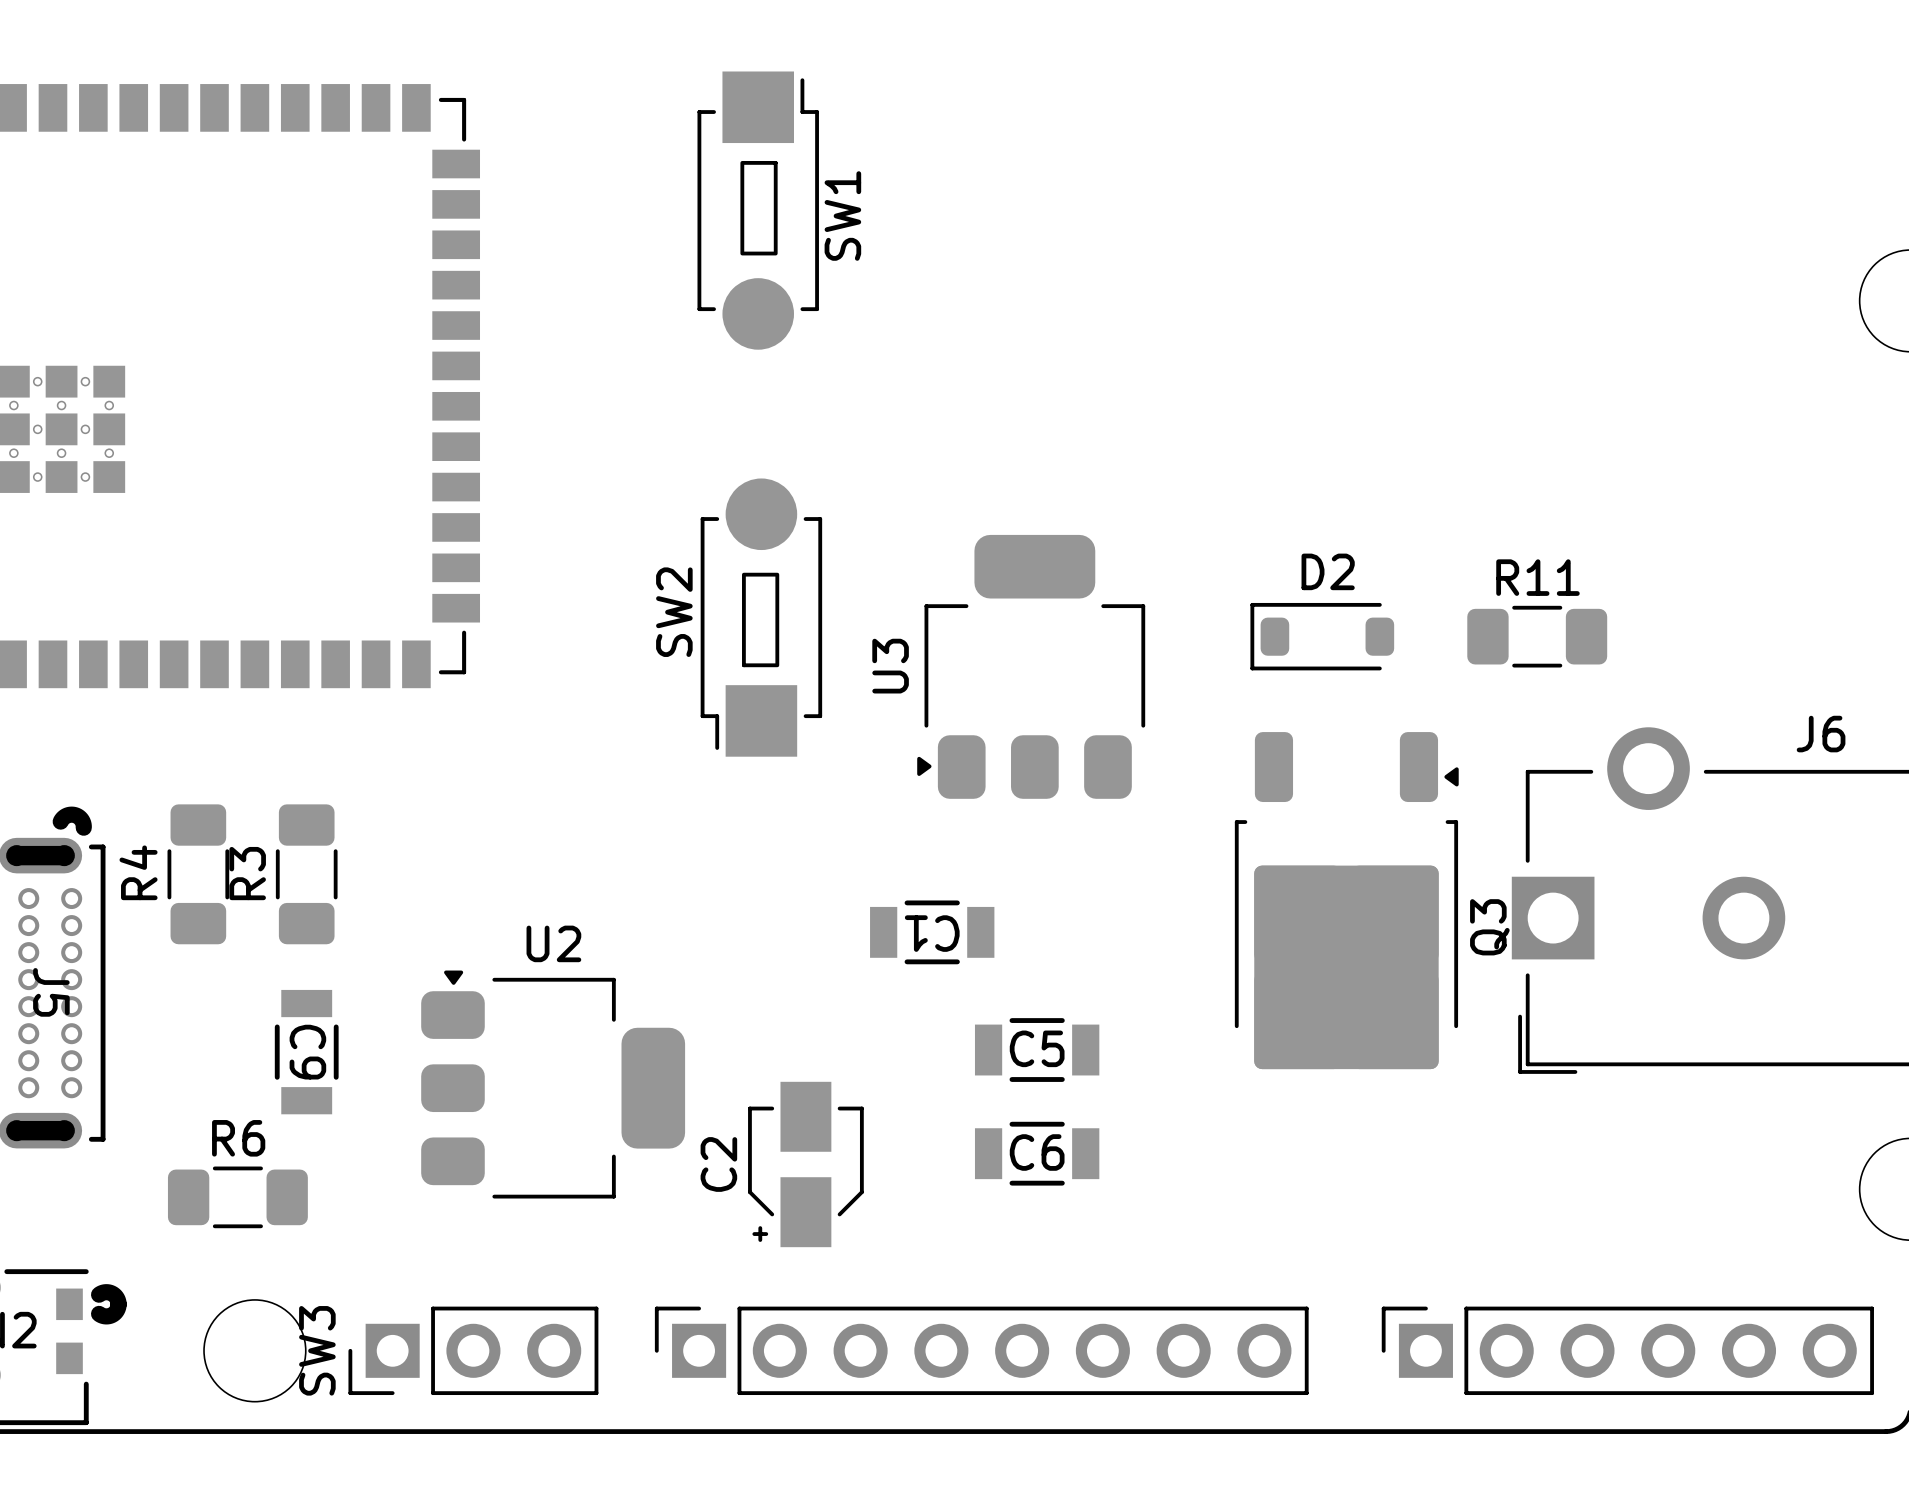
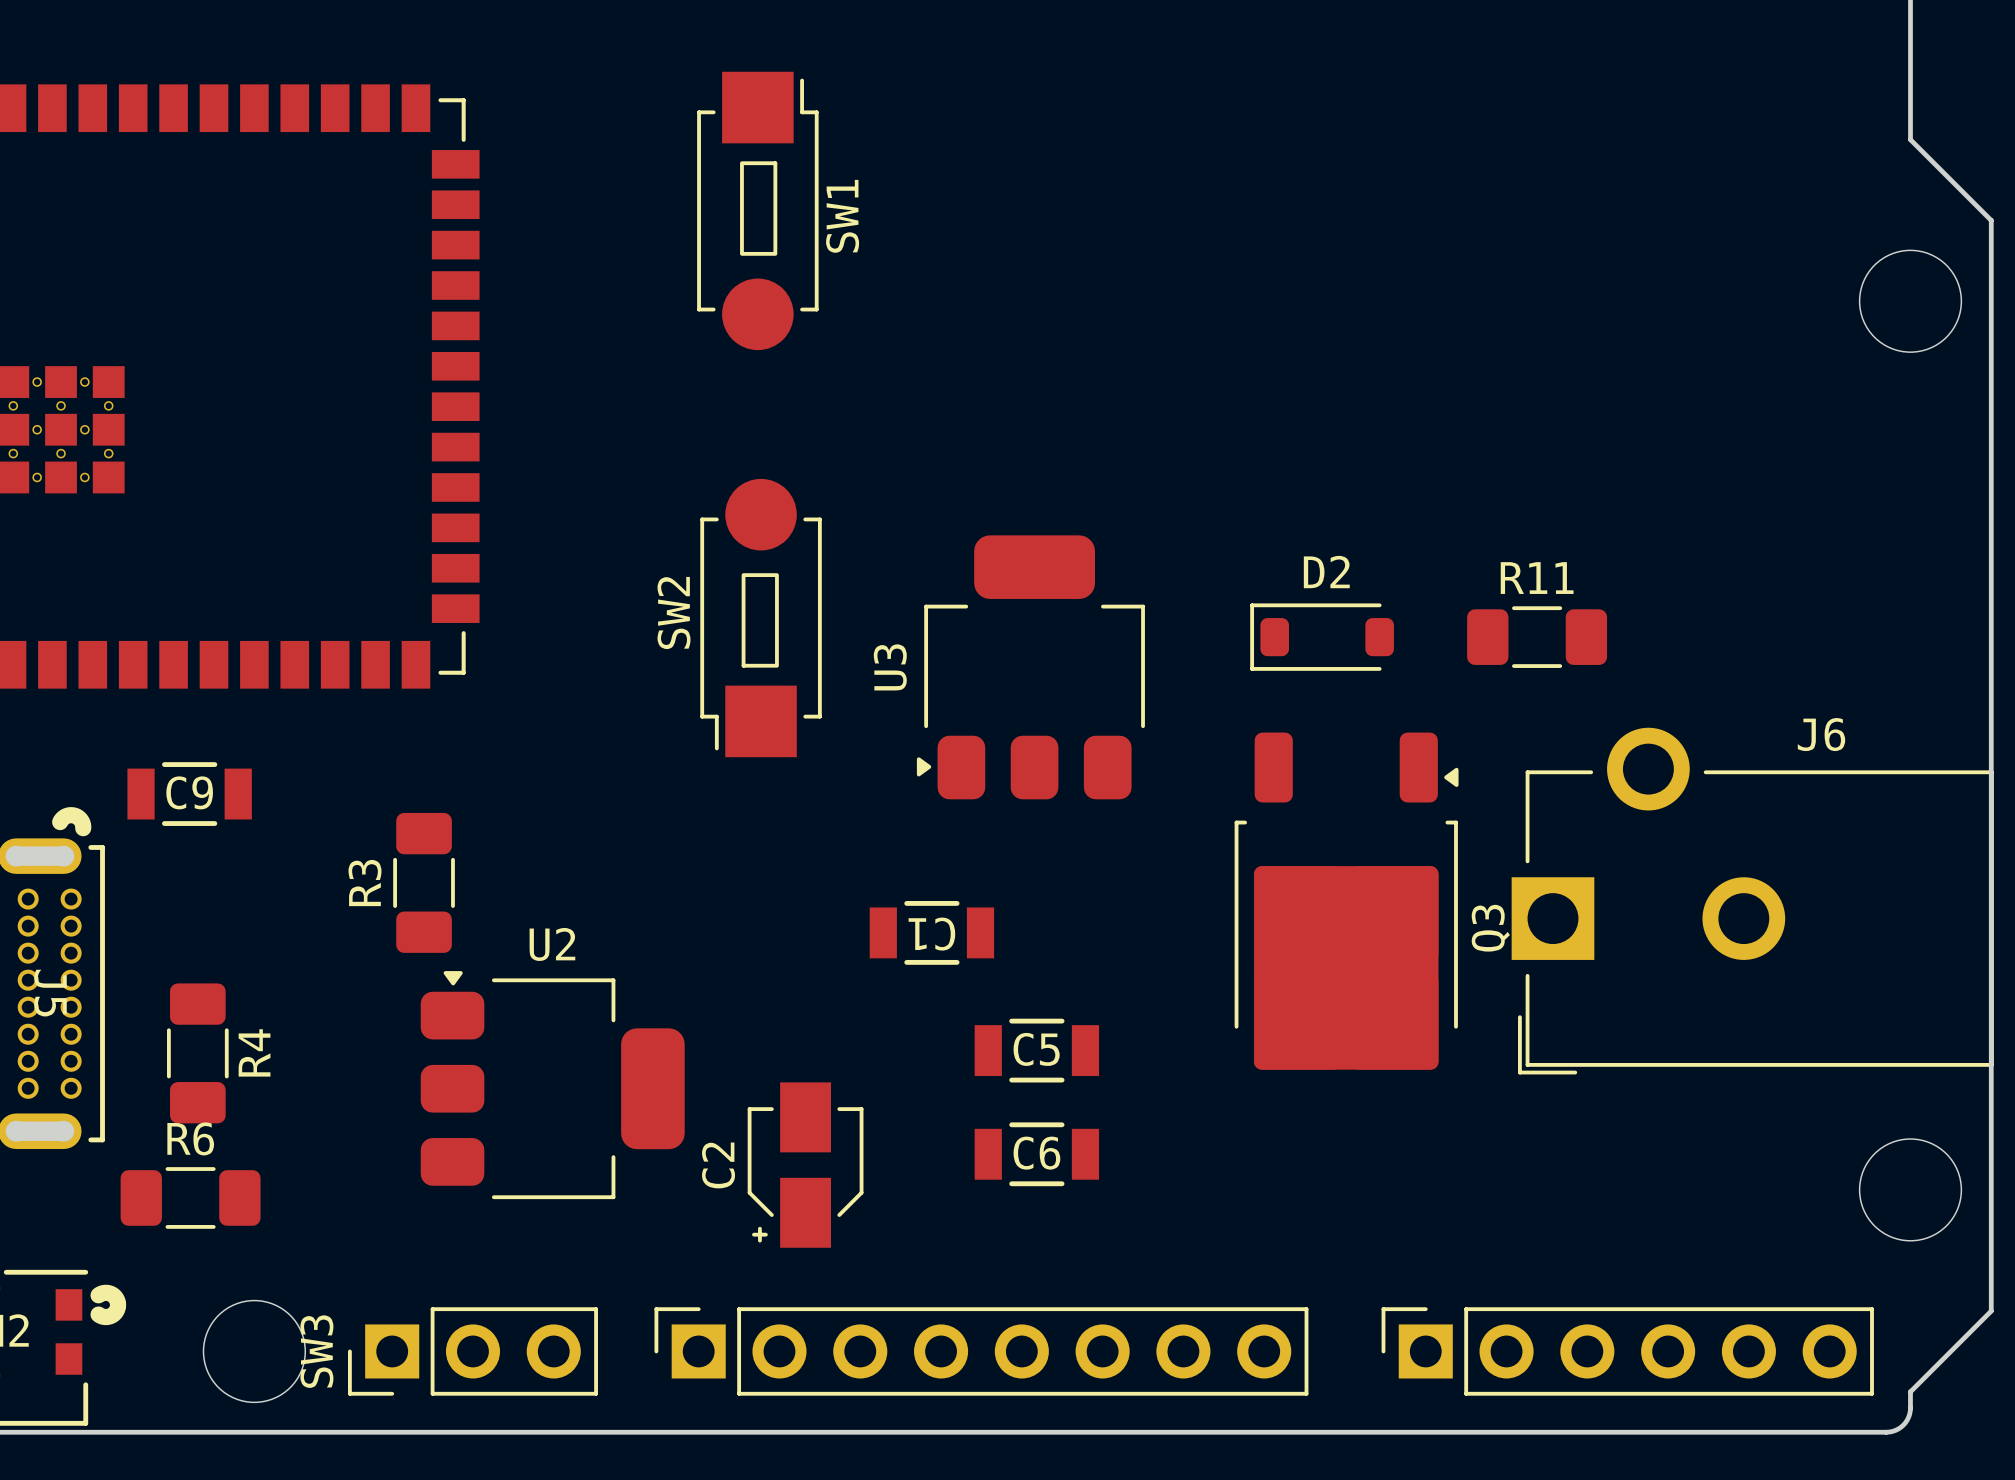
R4 name position: R4 (138, 872) -> R4 (254, 1052)
R4 position: (198, 874) -> (197, 1053)
R3 position: (306, 874) -> (424, 882)
C9 rotation: 0° (306, 1052) -> 90° clockwise (189, 794)
C9 position: (306, 1052) -> (189, 794)
R6 position: (237, 1197) -> (190, 1197)

